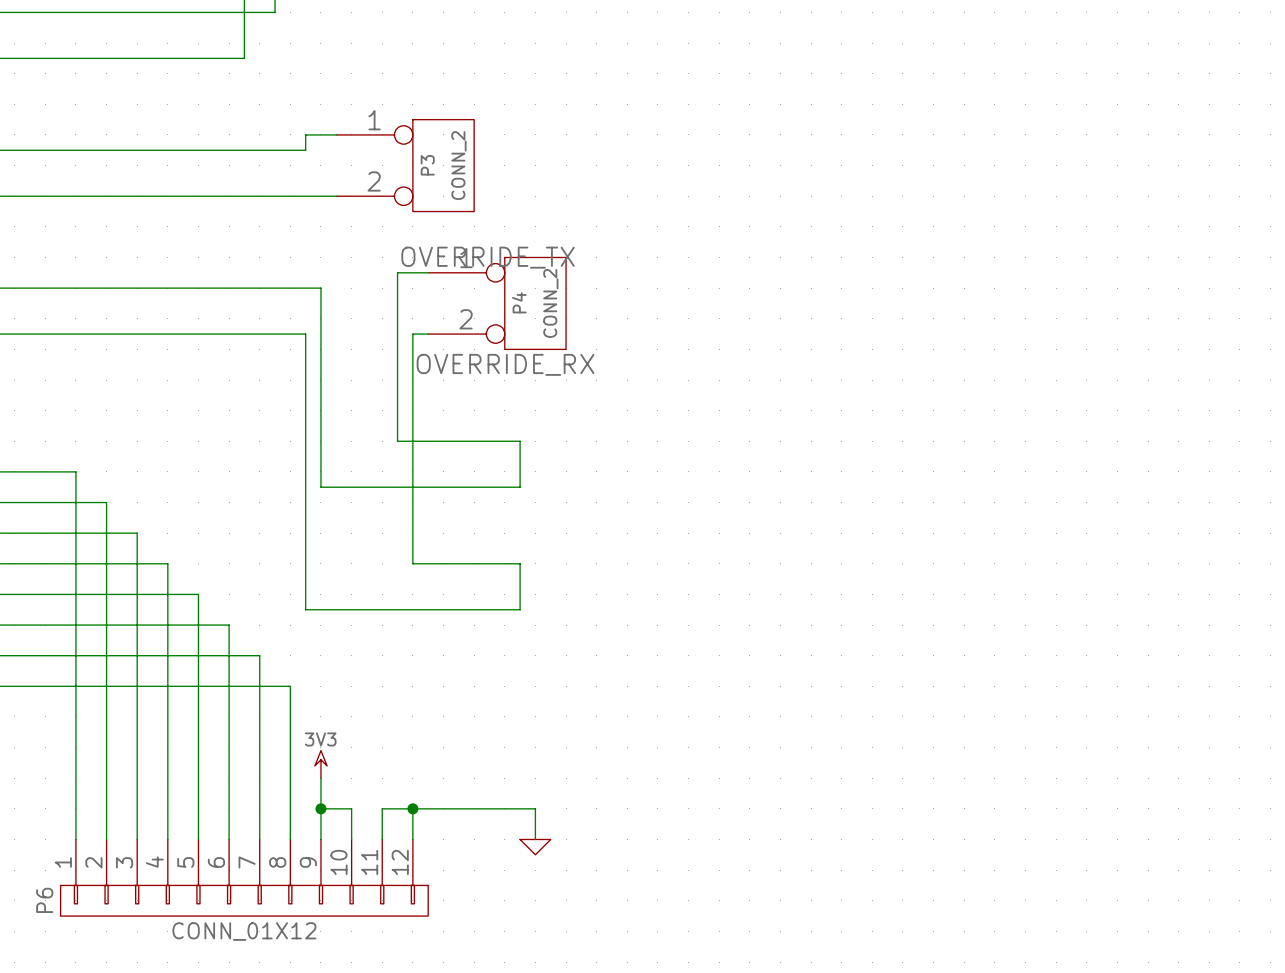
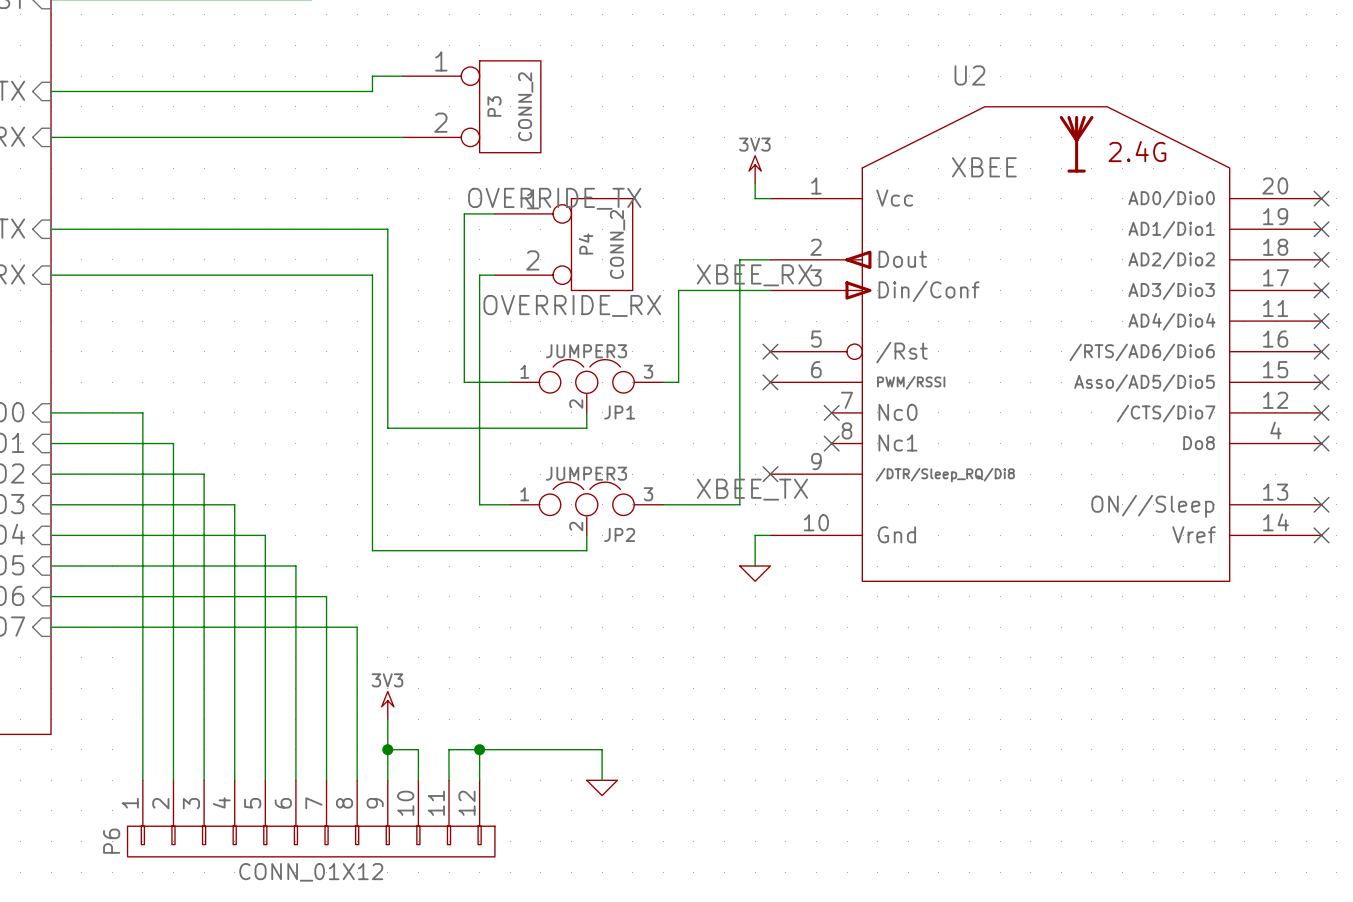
power symbol: none -> 3V3 (755, 169)
wire: none -> (755, 183) (755, 198) (770, 198)
no-connect mark: none -> (1321, 198)
no-connect mark: none -> (1321, 229)
wire: none -> (770, 259) (739, 259) (739, 504) (663, 504)
no-connect mark: none -> (1321, 259)
label: none -> XBEE_RX (754, 275)
wire: none -> (770, 290) (678, 290) (678, 382) (663, 382)
no-connect mark: none -> (1321, 290)
no-connect mark: none -> (1321, 321)
U2: none -> XBEE (1046, 344)
no-connect mark: none -> (770, 351)
no-connect mark: none -> (1321, 351)
wire: (443, 441) (520, 441) (520, 471) -> none
no-connect mark: none -> (770, 382)
no-connect mark: none -> (1321, 382)
JP1: none -> JUMPER3 (586, 386)
no-connect mark: none -> (831, 412)
no-connect mark: none -> (1321, 412)
no-connect mark: none -> (831, 443)
no-connect mark: none -> (1321, 443)
no-connect mark: none -> (770, 474)
label: none -> XBEE_TX (752, 489)
wire: (443, 563) (520, 563) (520, 594) -> none
no-connect mark: none -> (1321, 504)
JP2: none -> JUMPER3 (586, 508)
wire: none -> (770, 535) (755, 535) (755, 566)
no-connect mark: none -> (1321, 535)
power symbol: none -> (755, 573)

